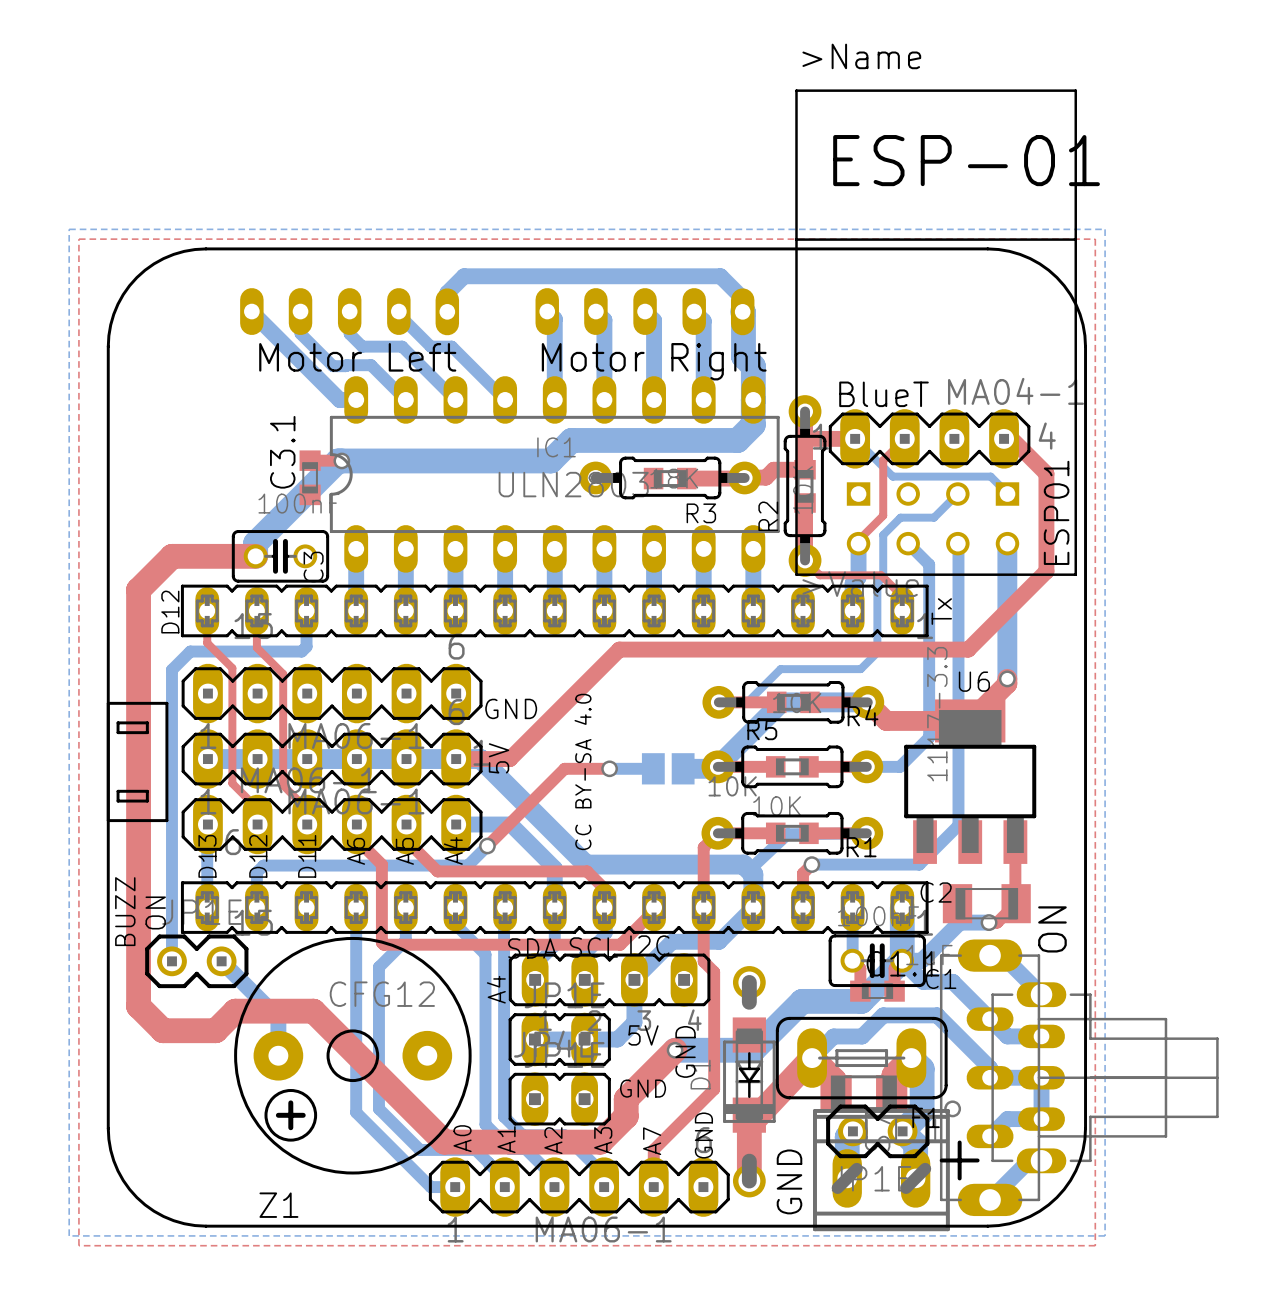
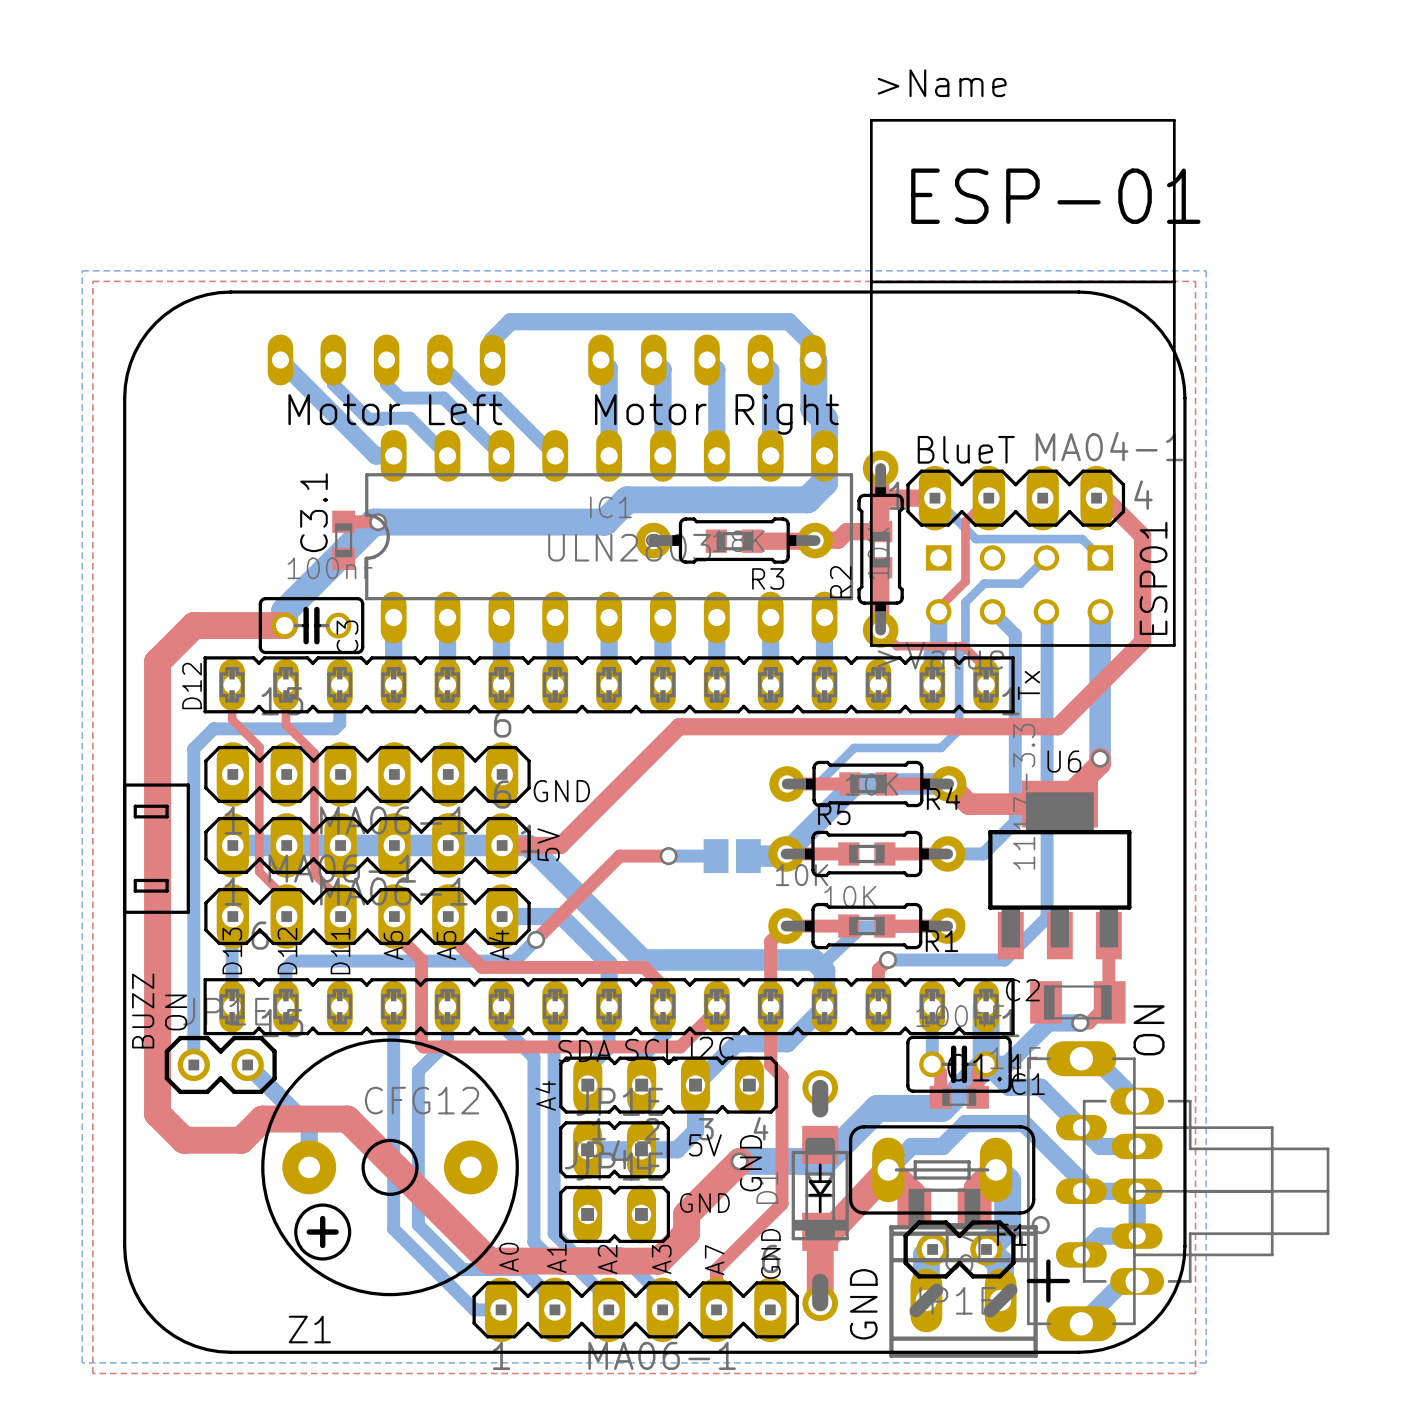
text: CC BY-SA 4.0 (583, 771) -> none

